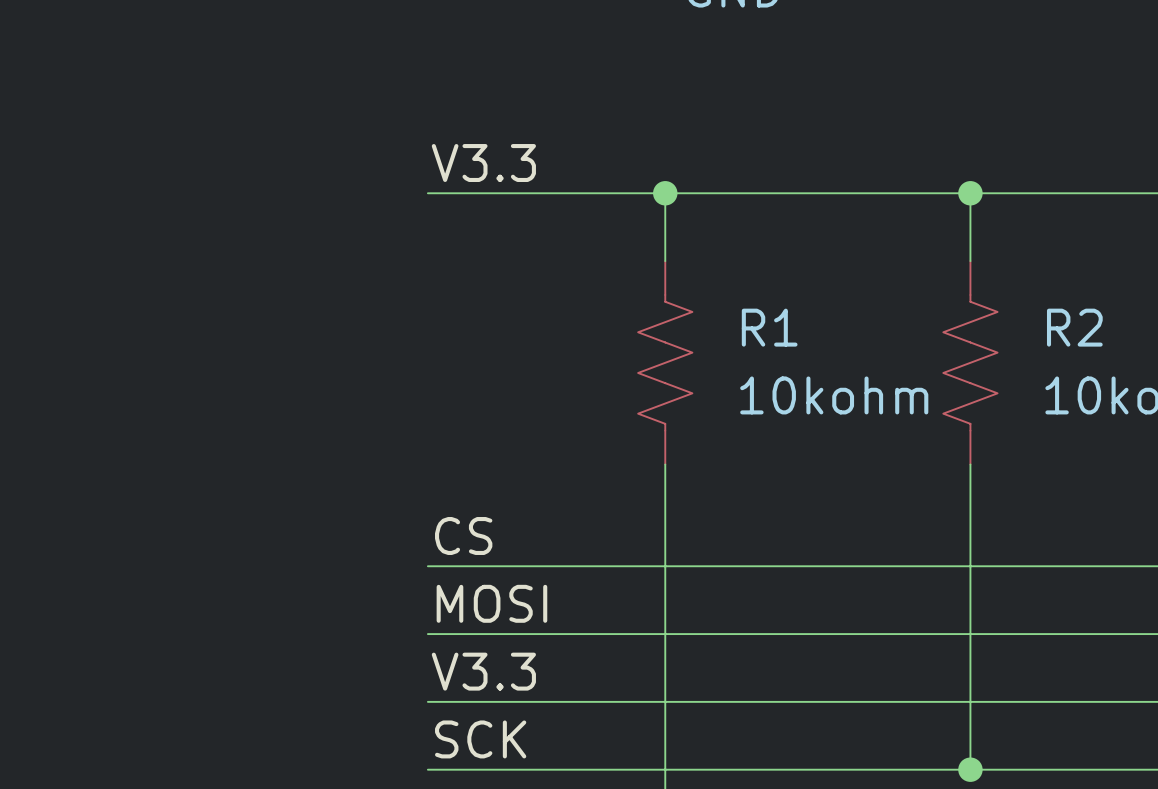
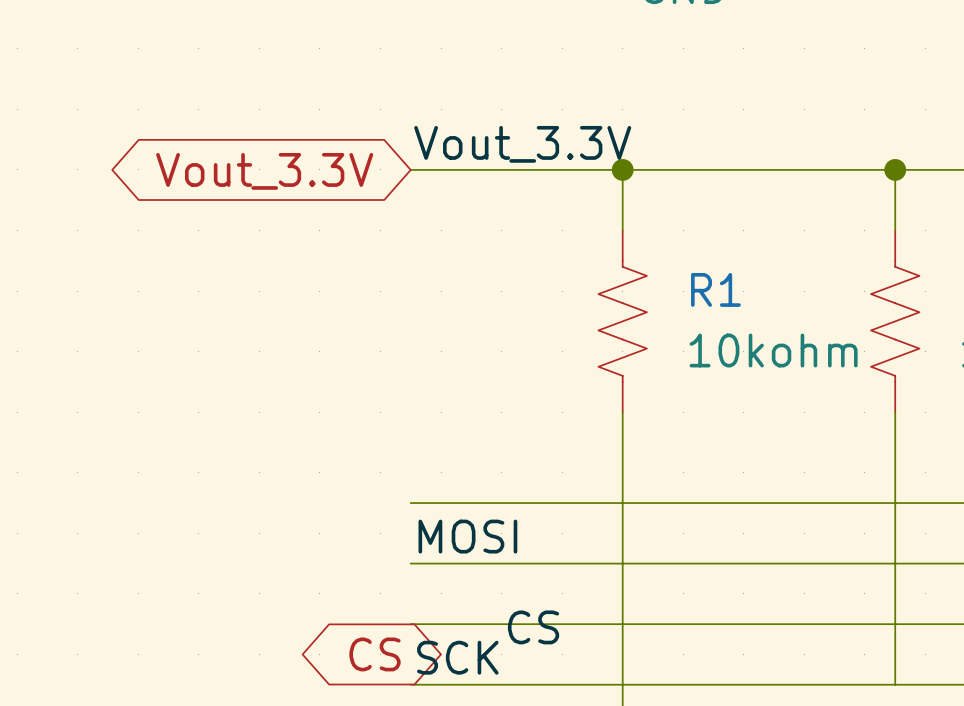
label: V3.3 (483, 163) -> Vout_3.3V (522, 144)
global label: none -> Vout_3.3V (264, 171)
label position: CS (463, 535) -> CS (533, 627)
label: V3.3 (483, 671) -> none
global label: none -> CS (374, 654)
junction: (970, 769) -> none

